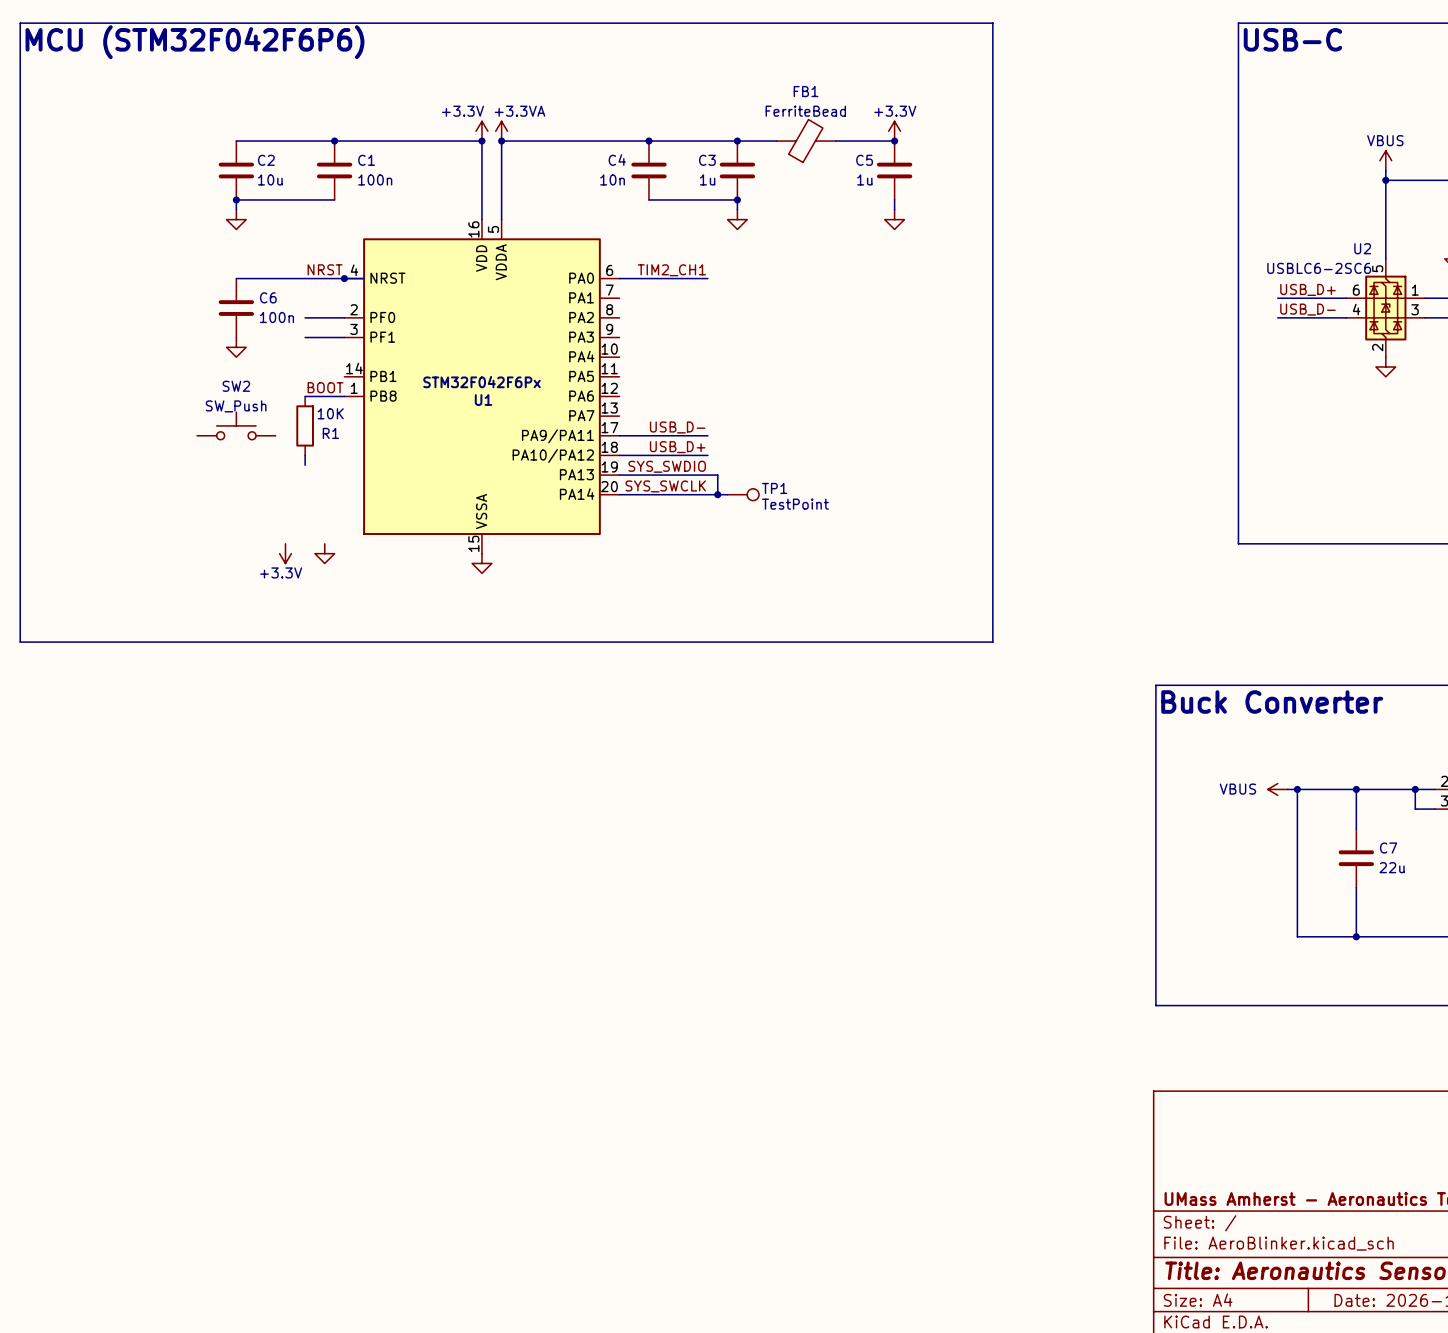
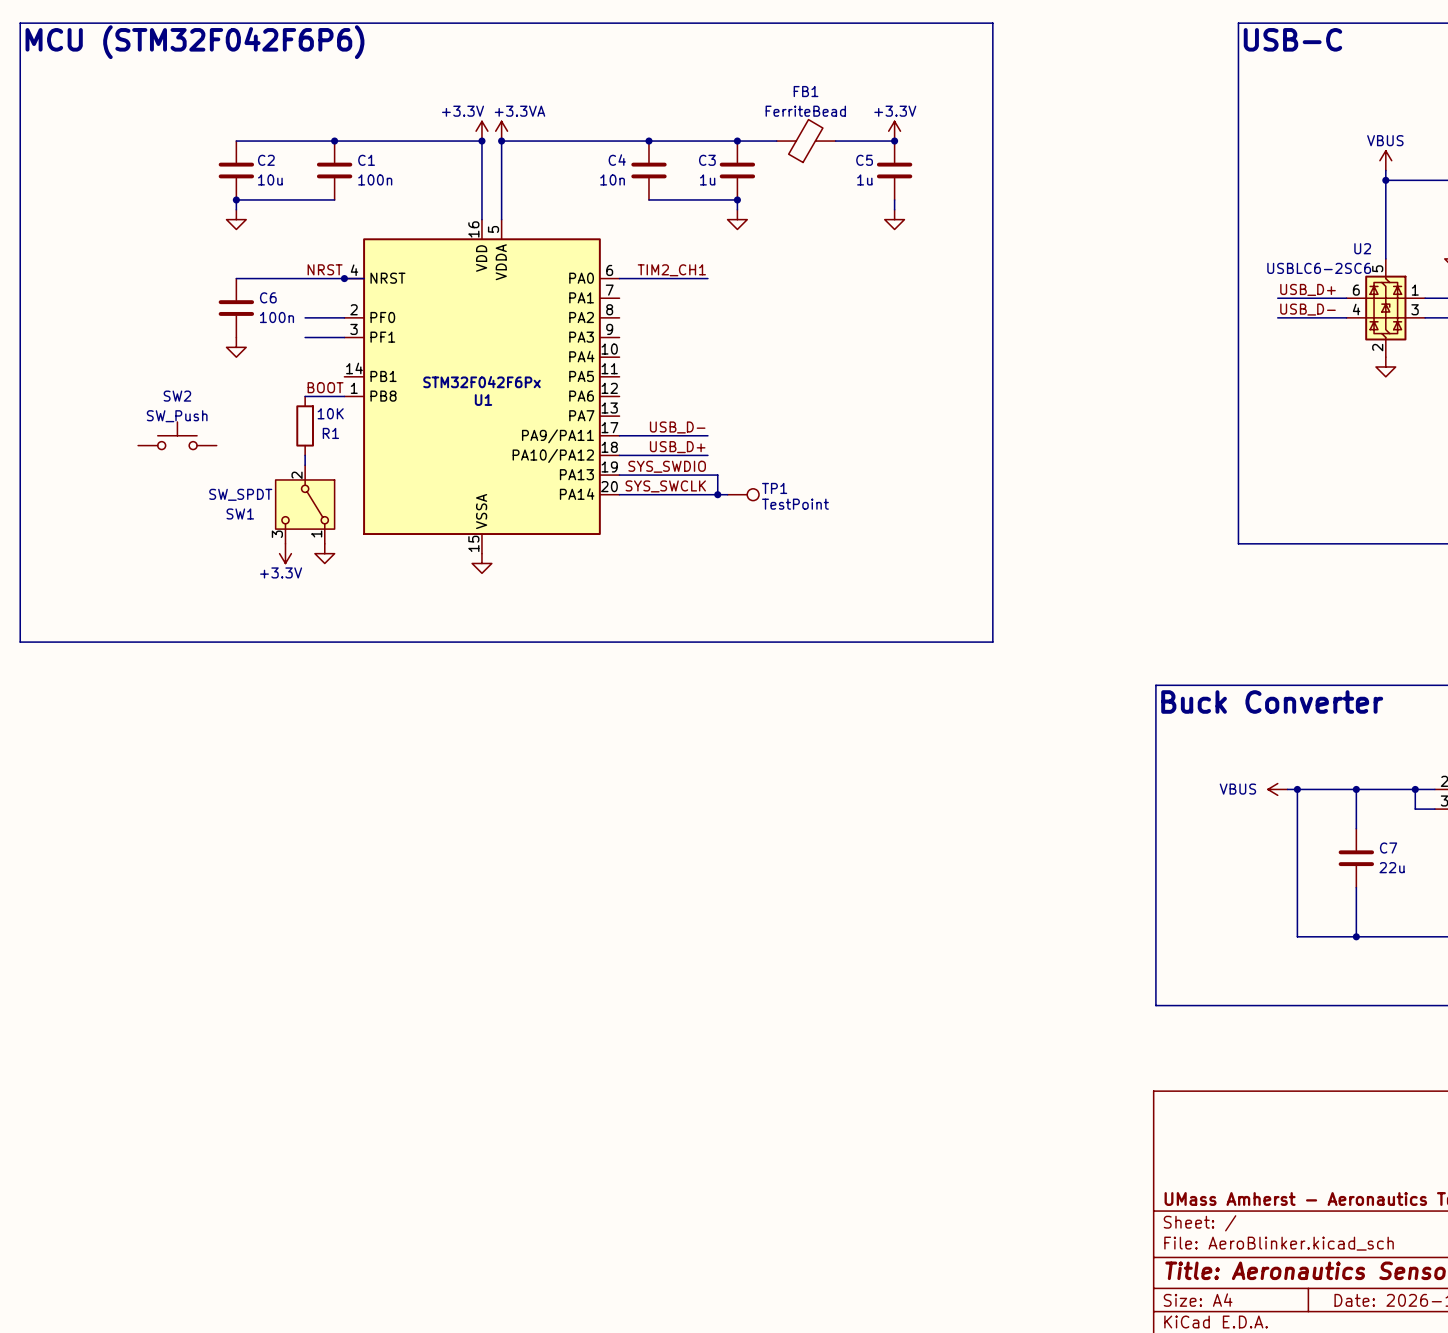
SW2 position: (236, 425) -> (177, 435)
SW1: none -> SW_SPDT (305, 504)

